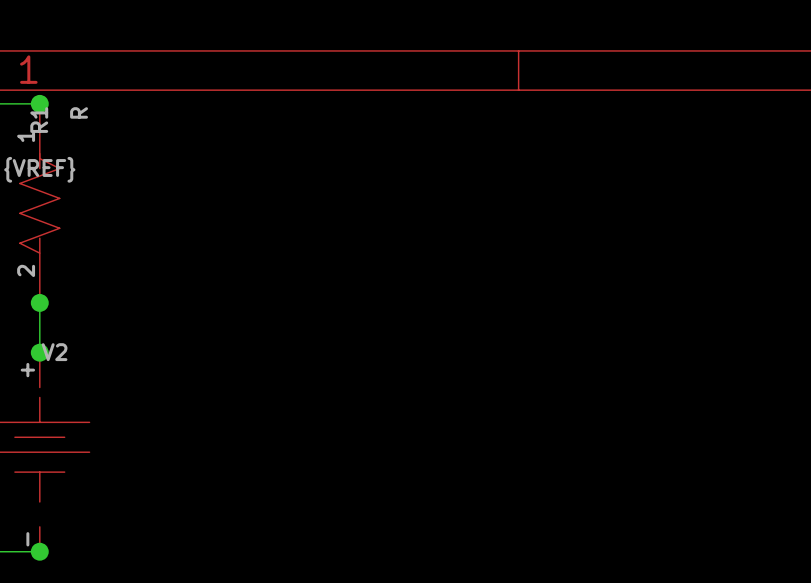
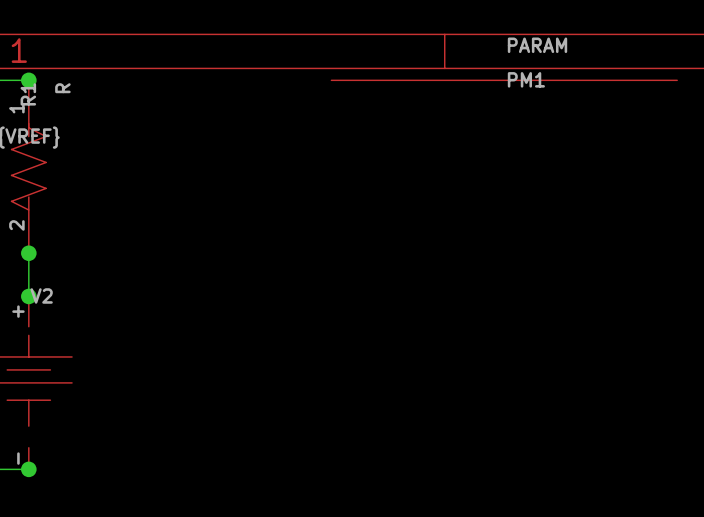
PM1: none -> PARAM (504, 80)

